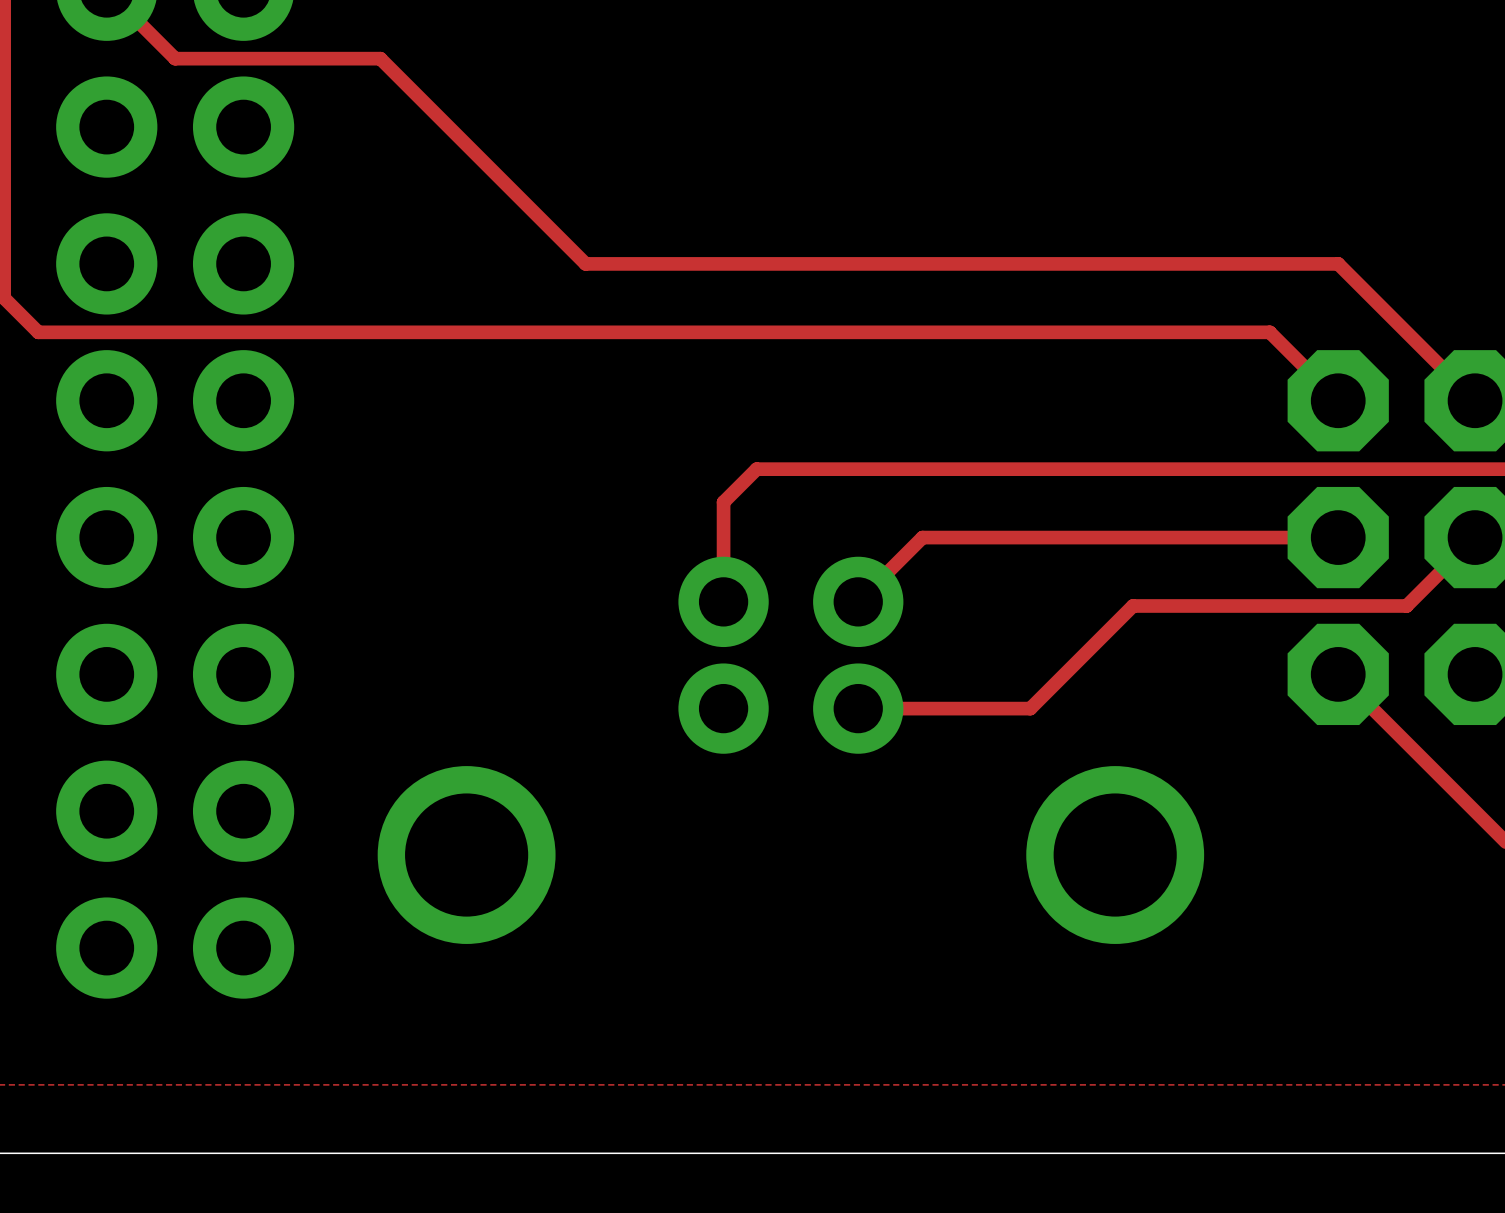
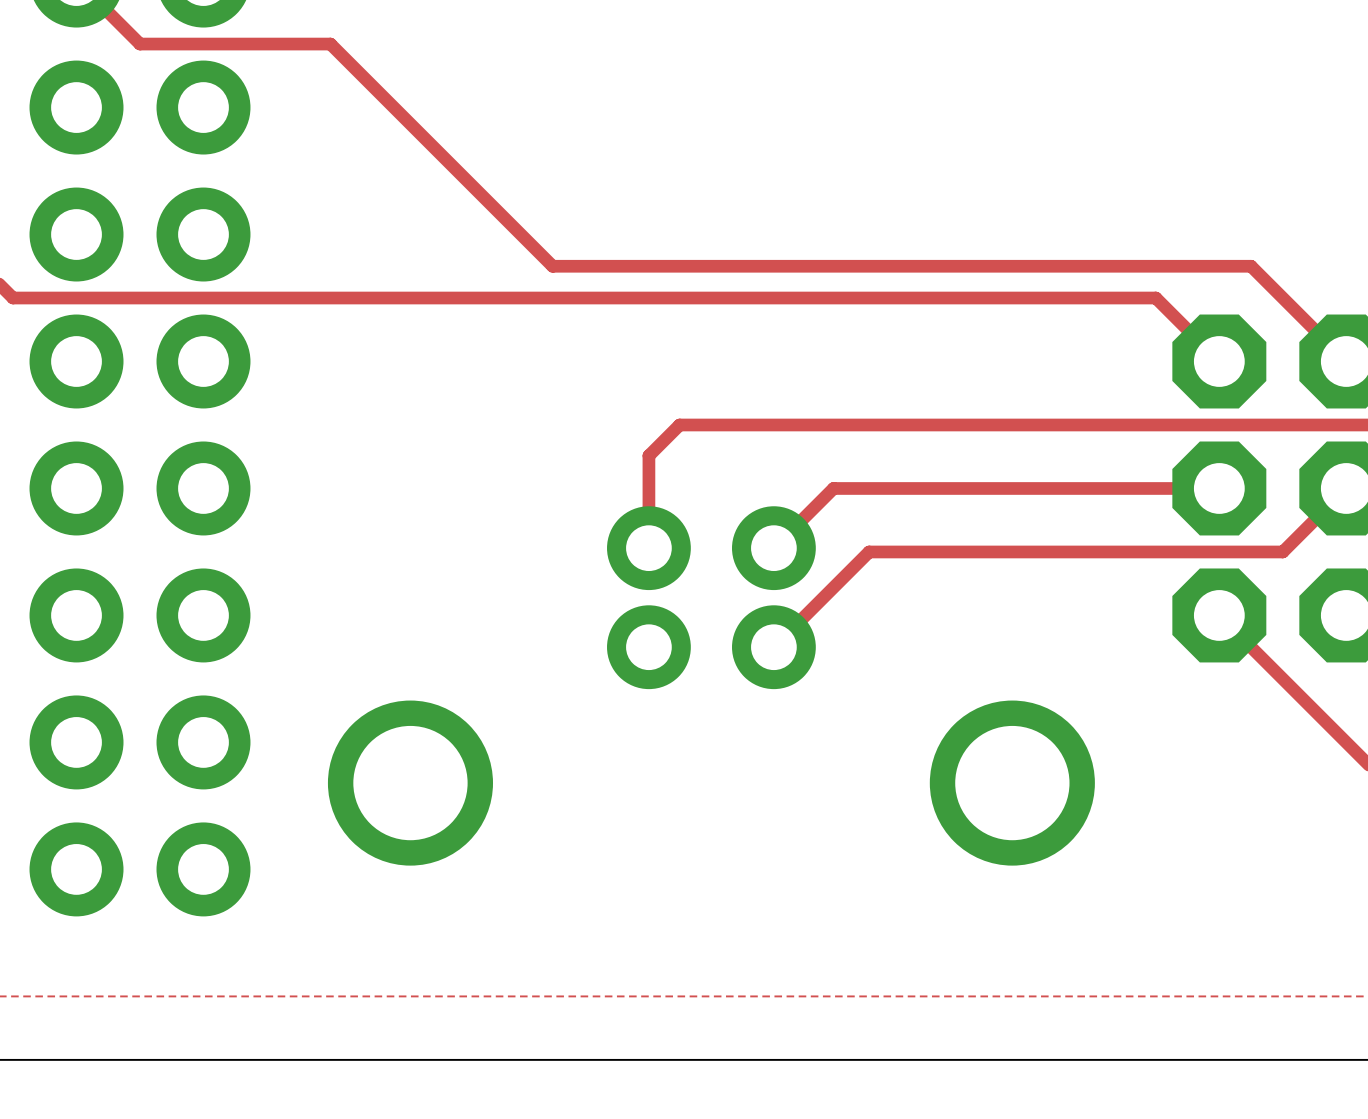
top track: (585, 263) (1338, 263) (1372, 298) -> (520, 234) (552, 266) (1251, 266)
top track: (1132, 605) (1030, 708) (858, 708) -> (1028, 551) (869, 551) (773, 647)

